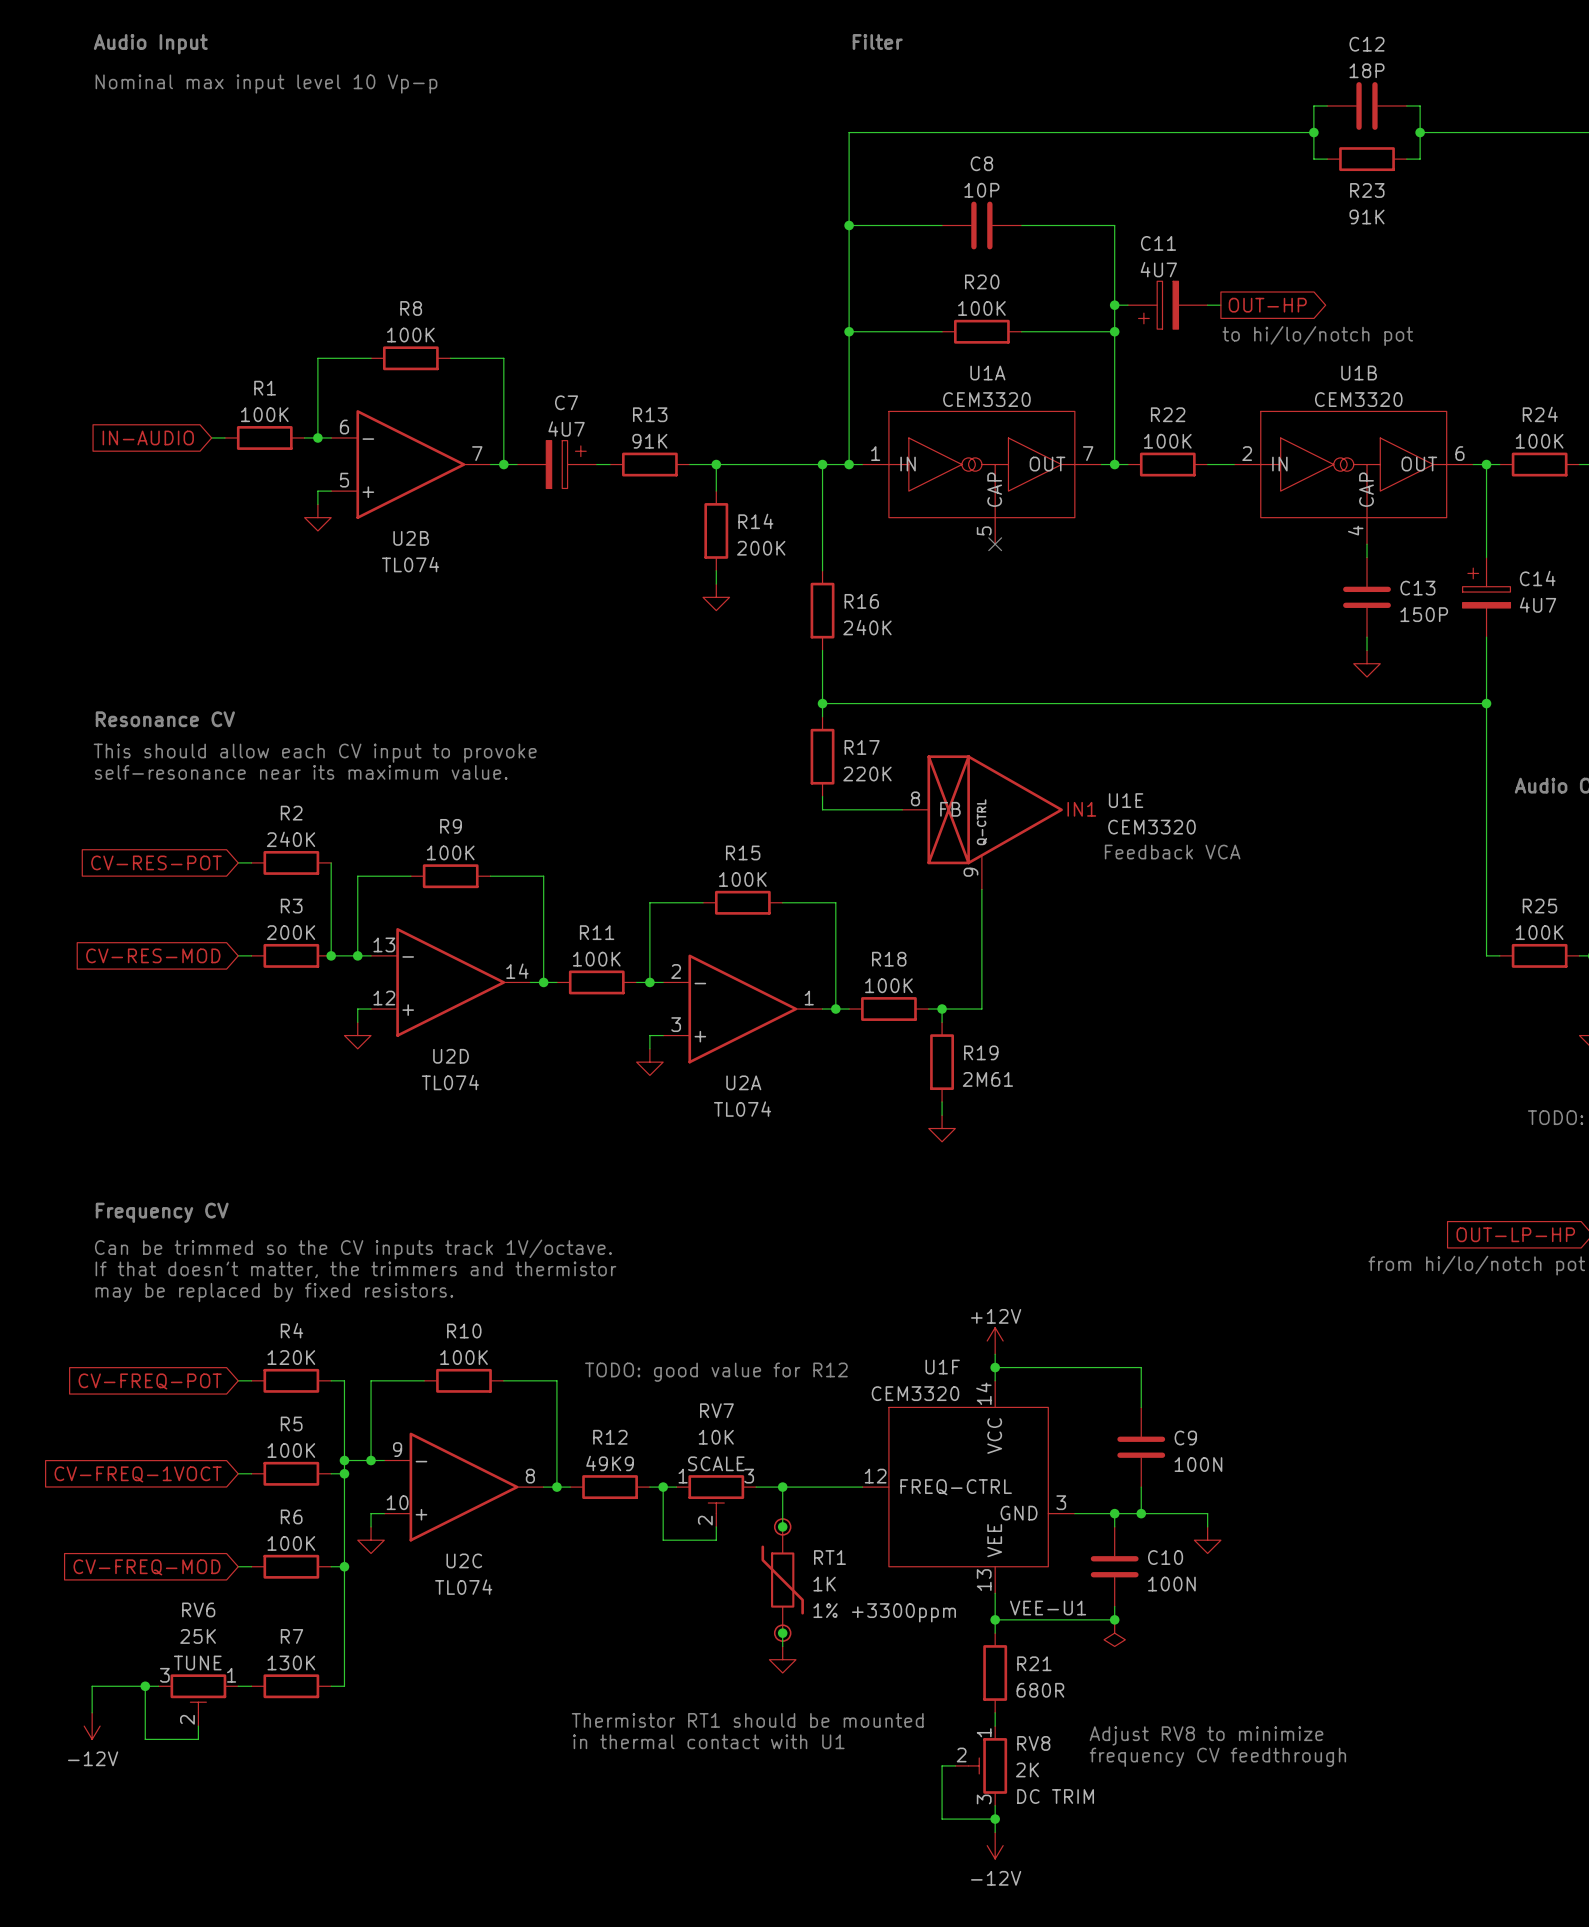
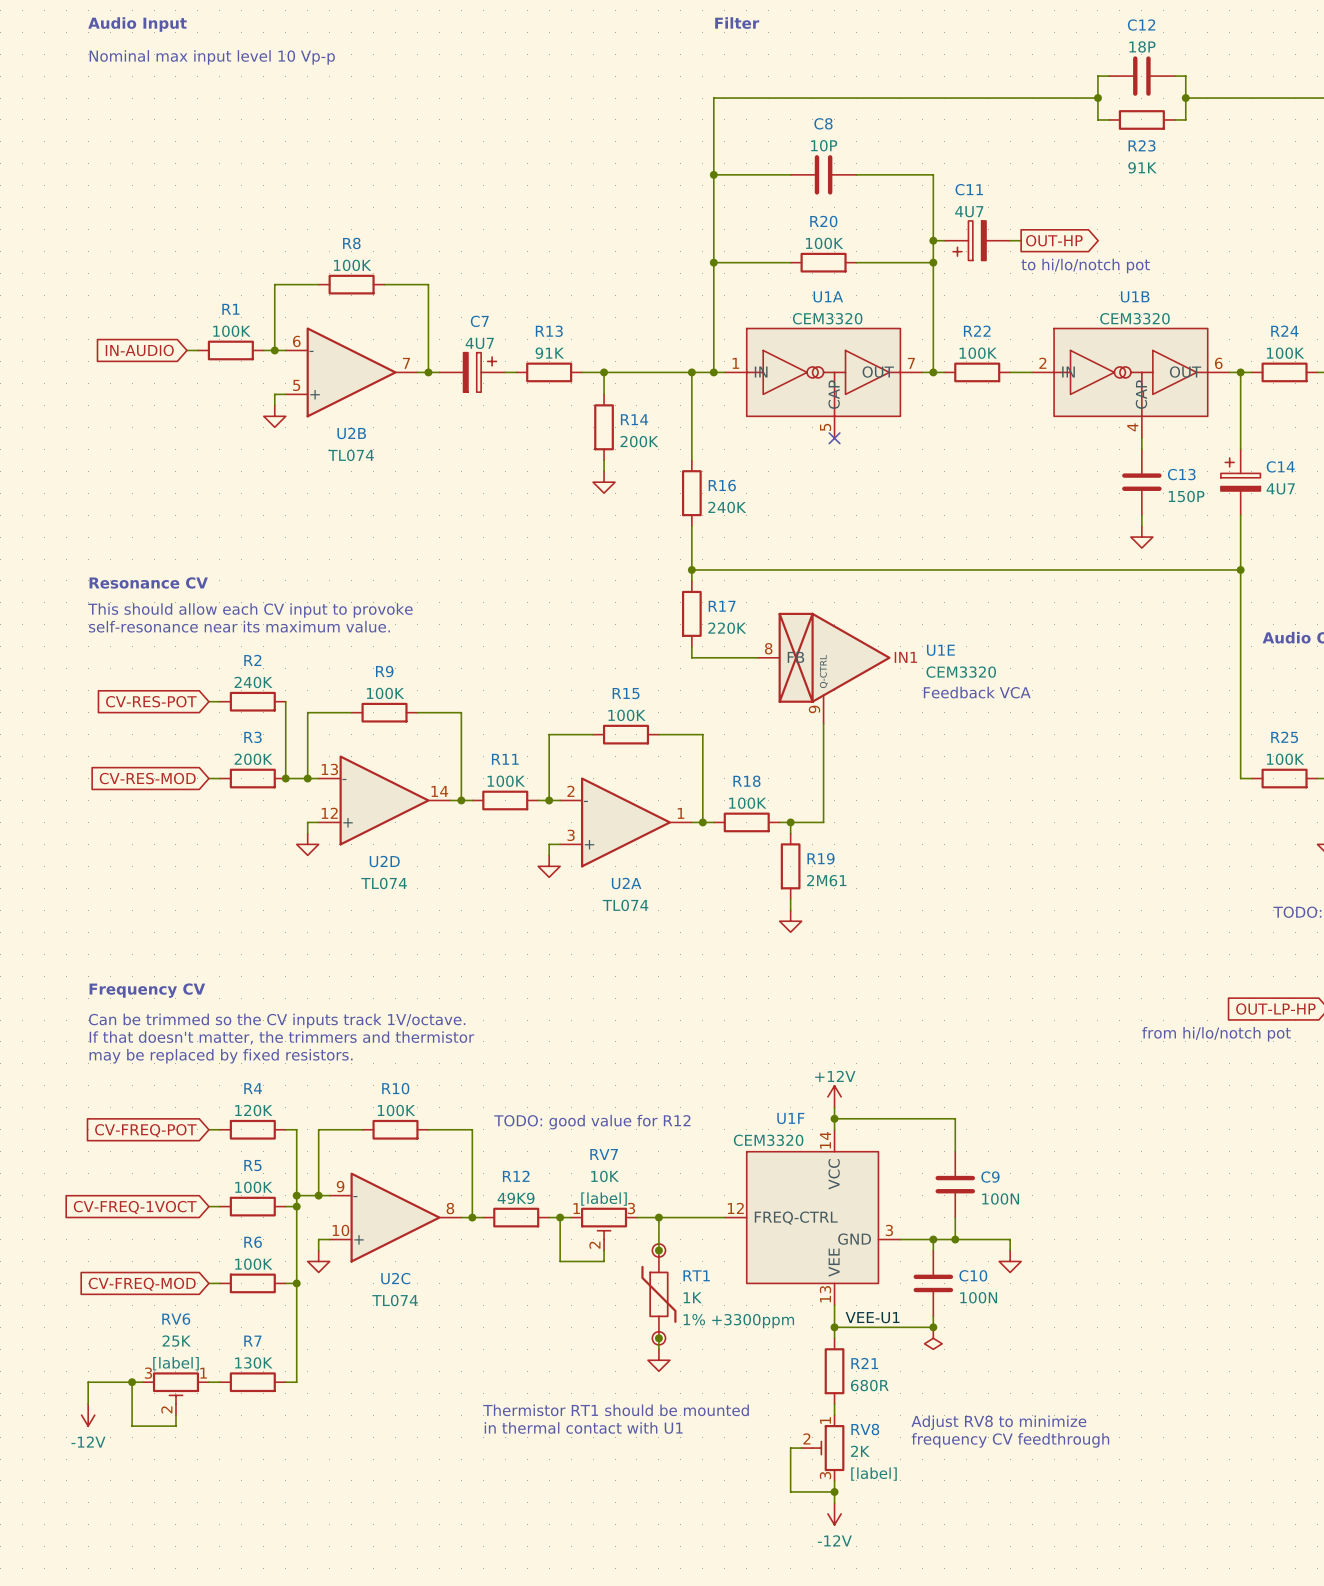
RV7 text: SCALE (716, 1463) -> [label] (604, 1199)
RV6 text: TUNE (197, 1662) -> [label] (175, 1363)
RV8 text: DC TRIM (1055, 1796) -> [label] (873, 1474)

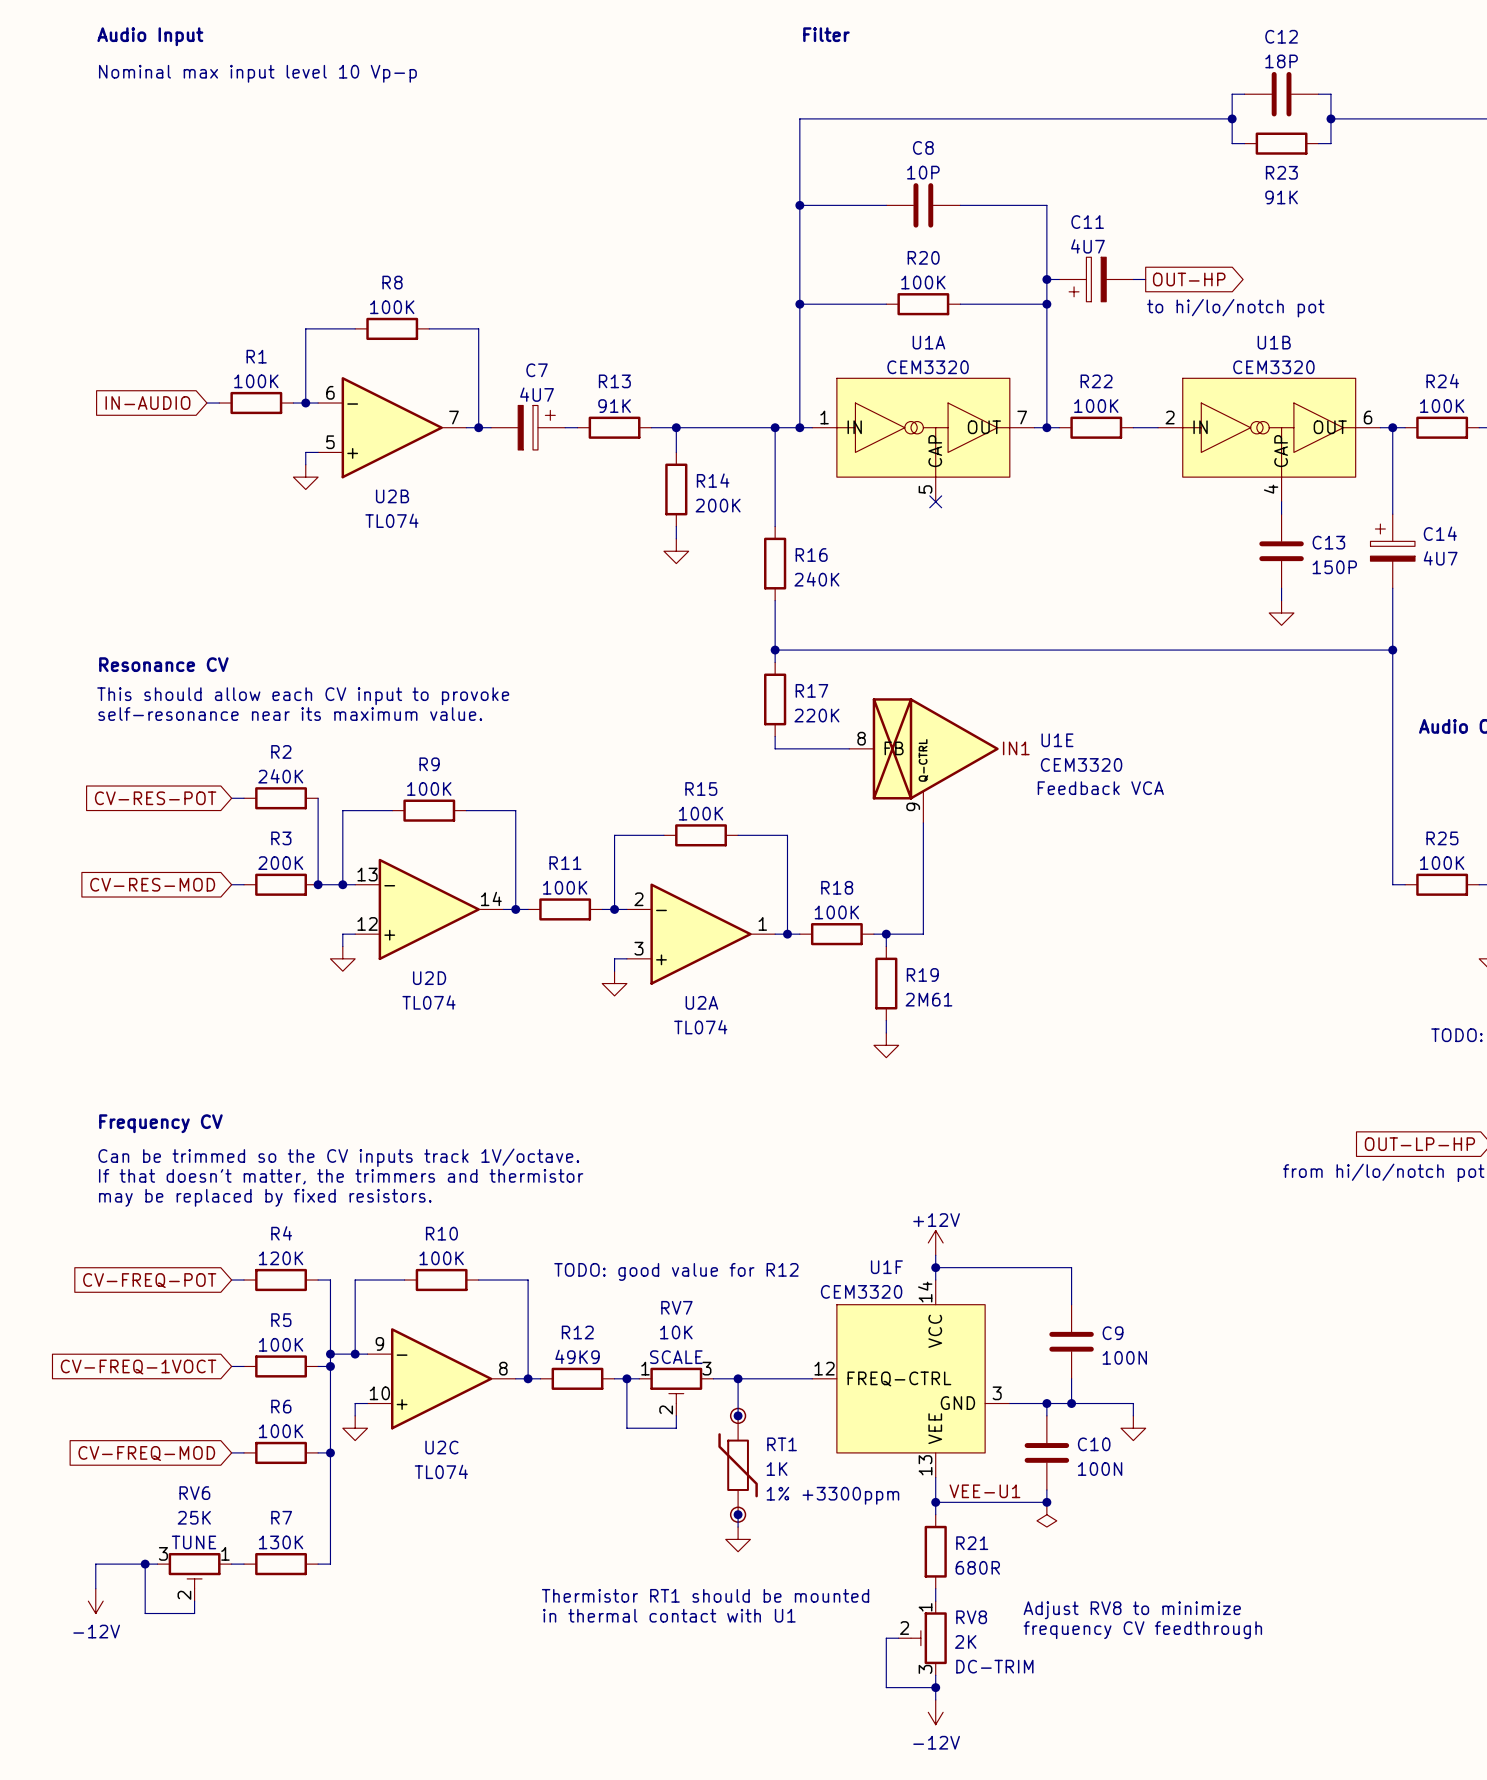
RV7 text: [label] (604, 1199) -> SCALE (676, 1357)
RV6 text: [label] (175, 1363) -> TUNE (194, 1542)
RV8 text: [label] (873, 1474) -> DC-TRIM (994, 1666)

